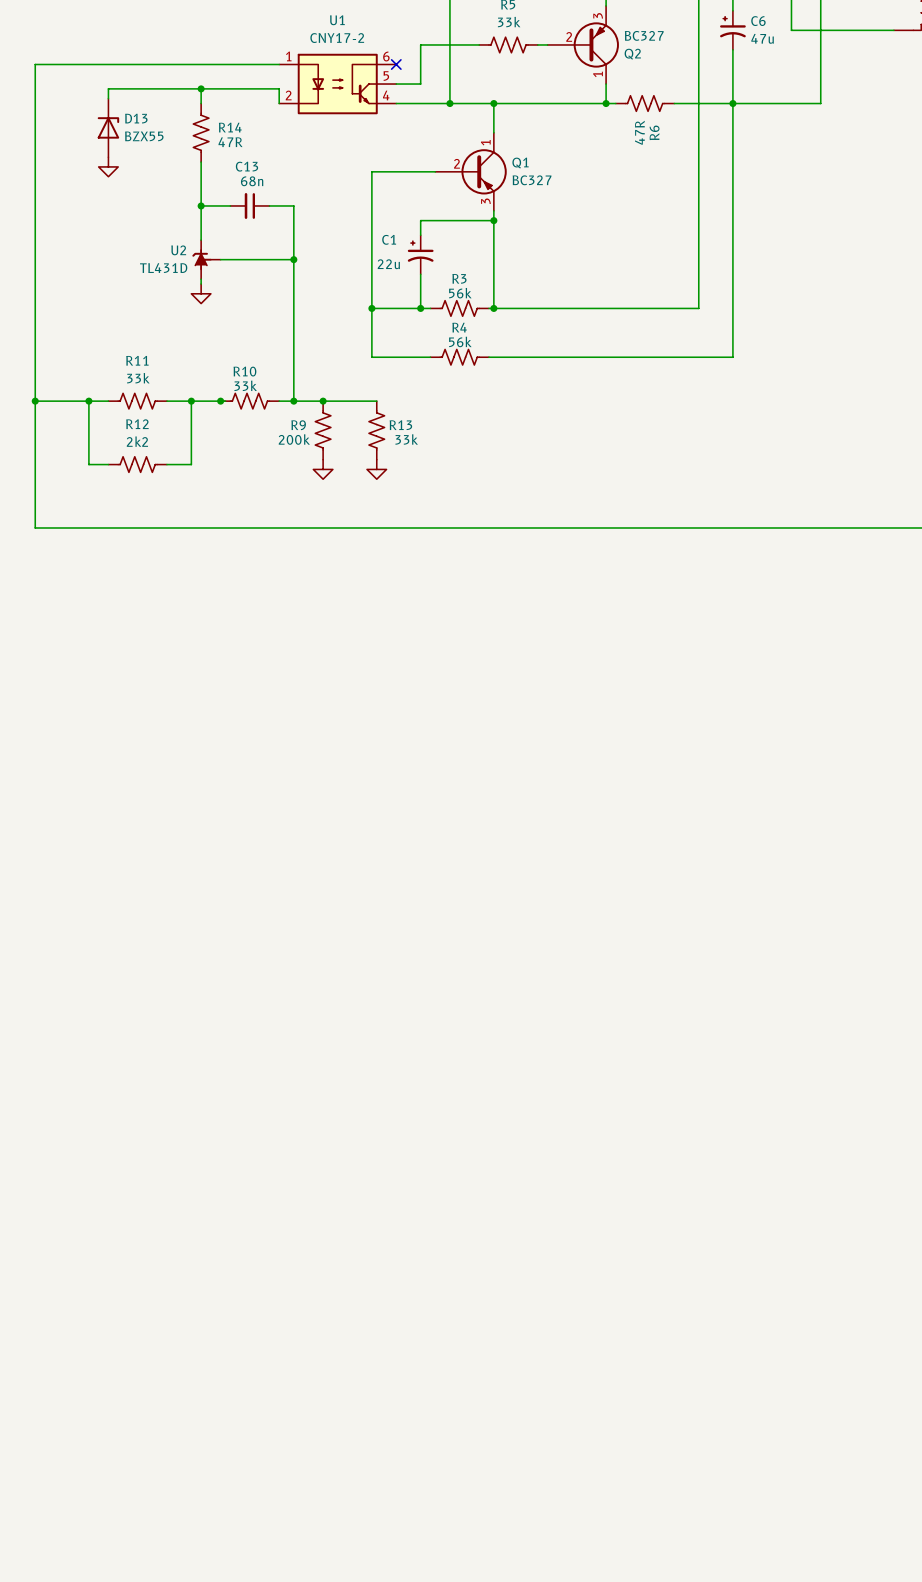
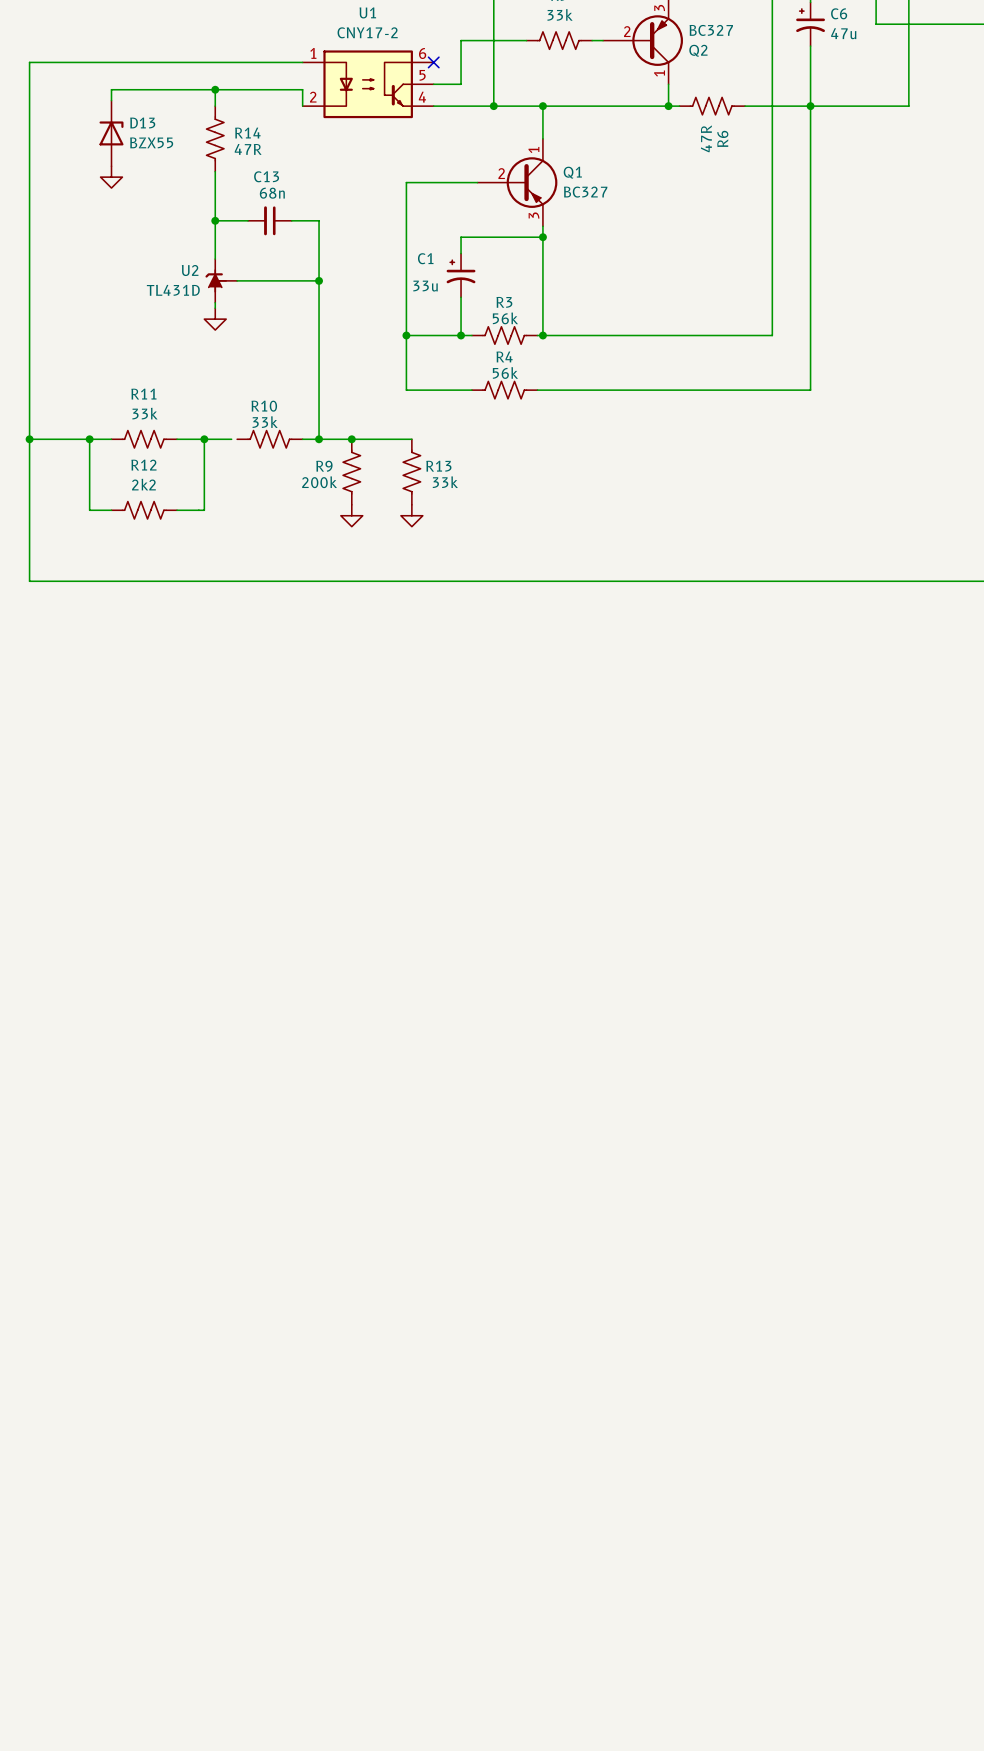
C1 value: 22u (388, 264) -> 33u (425, 286)
junction: (220, 401) -> none

